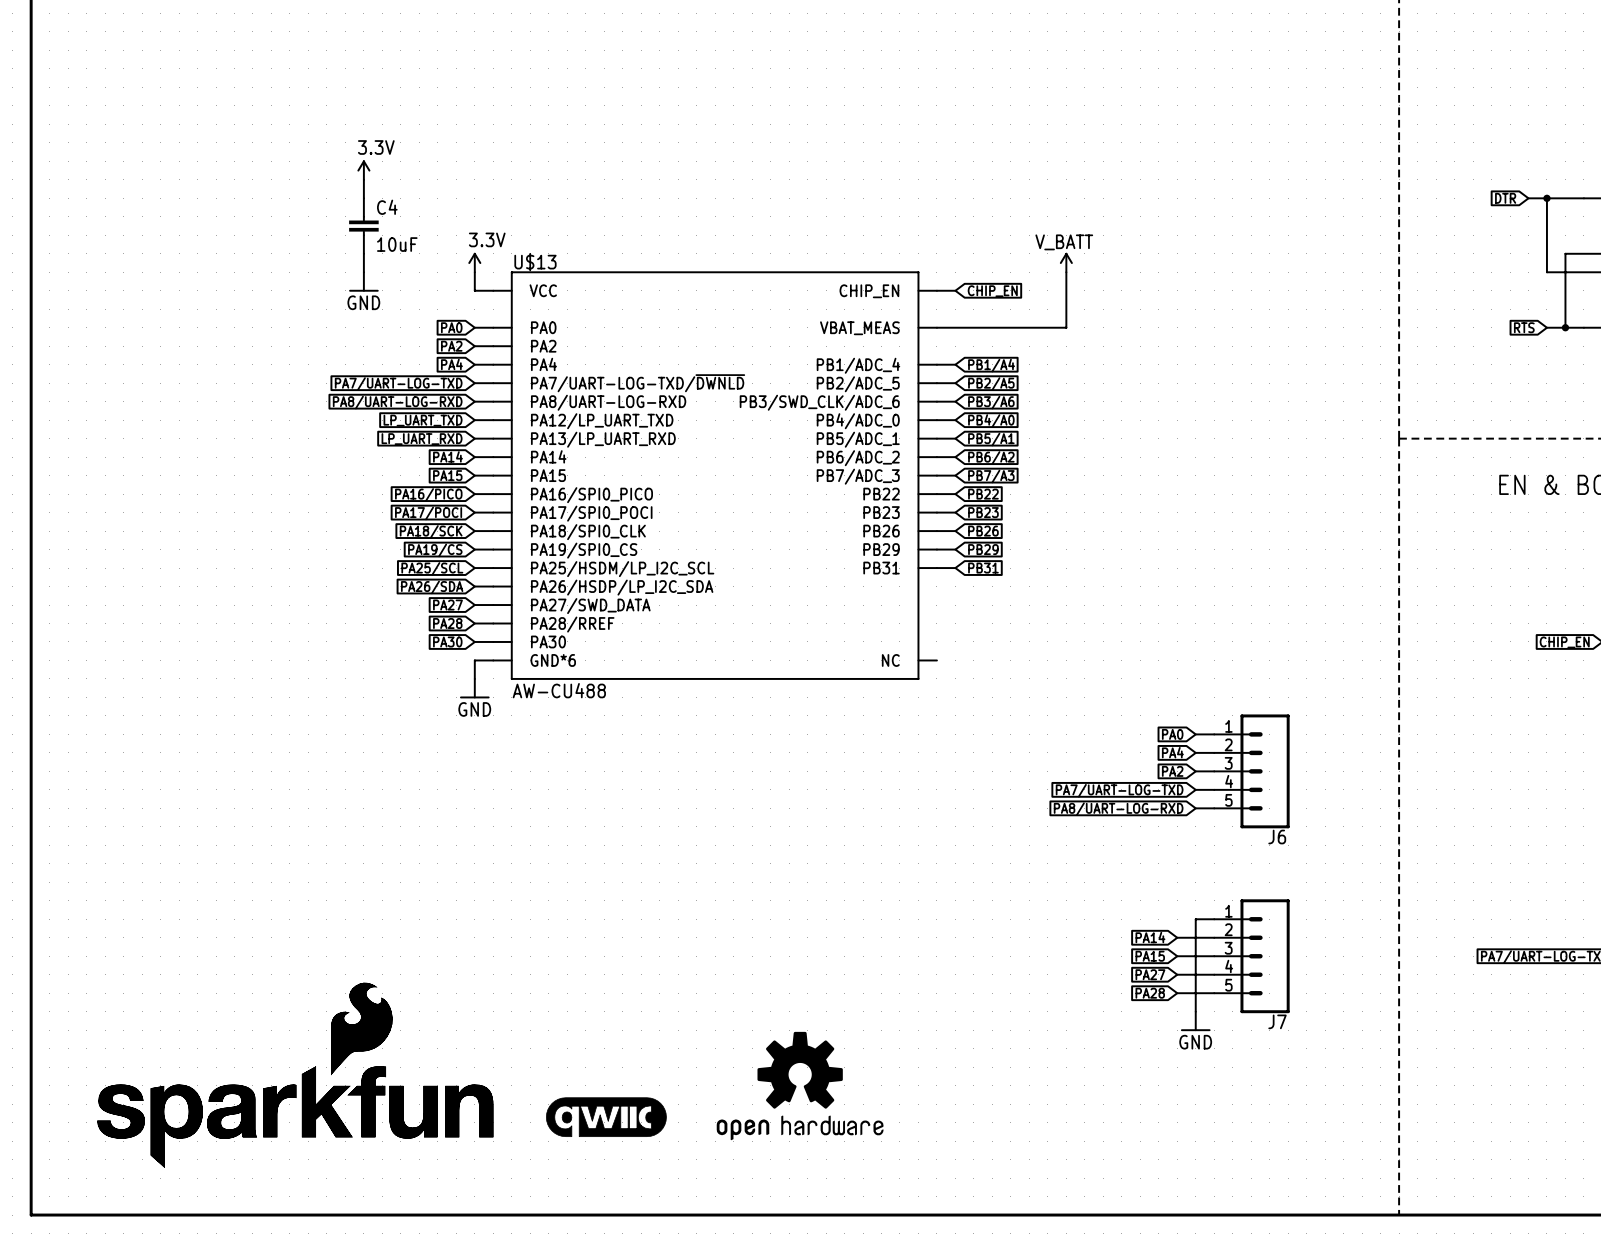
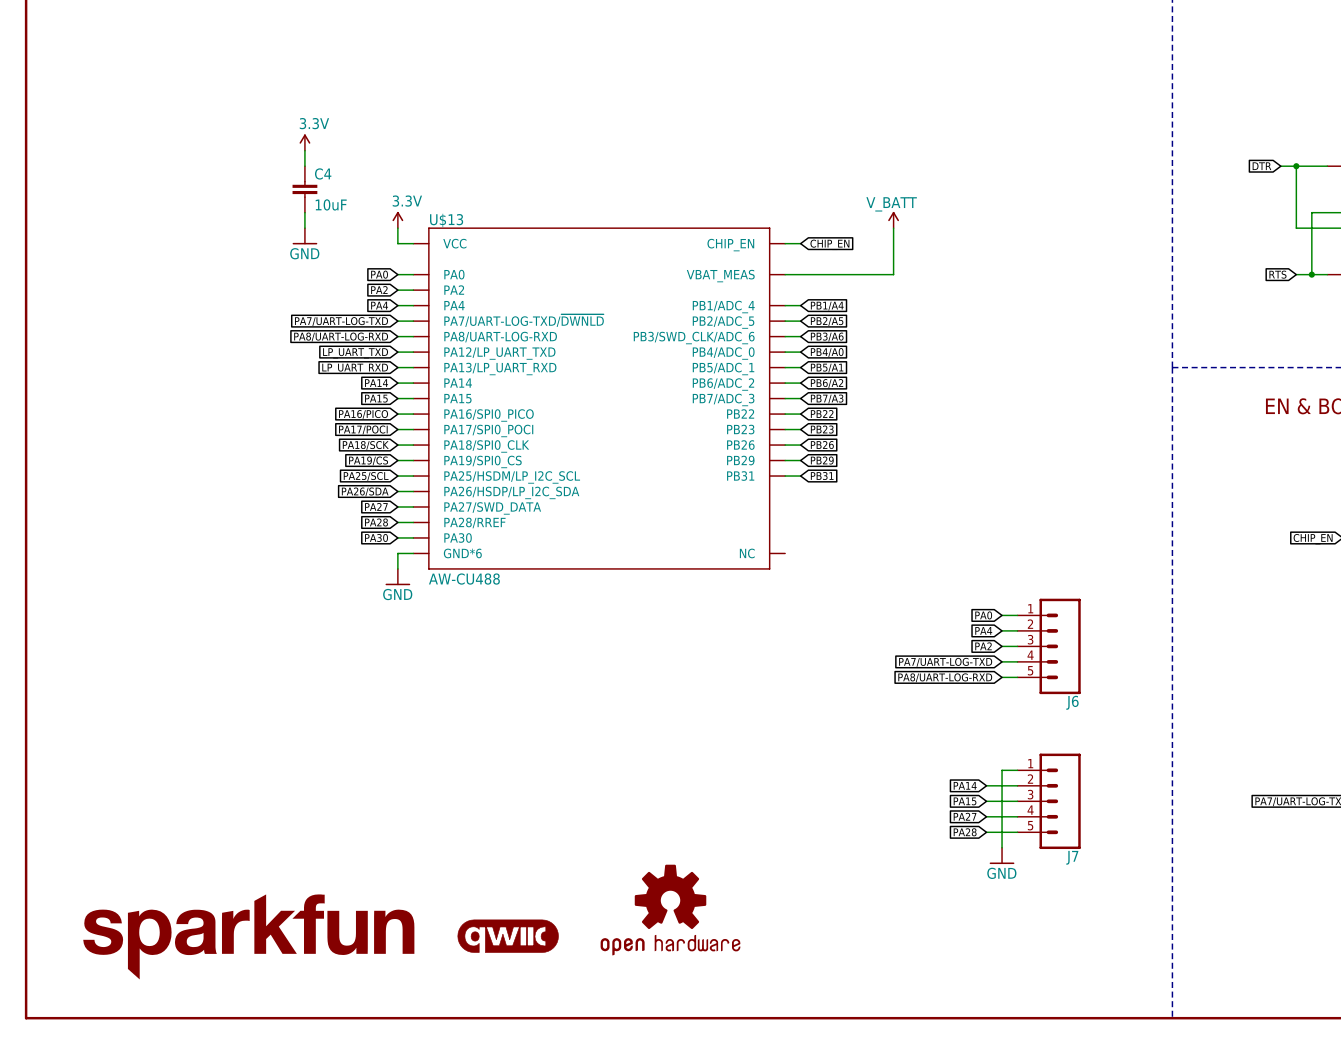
part: (295, 1075) -> none
part: none -> (248, 936)

